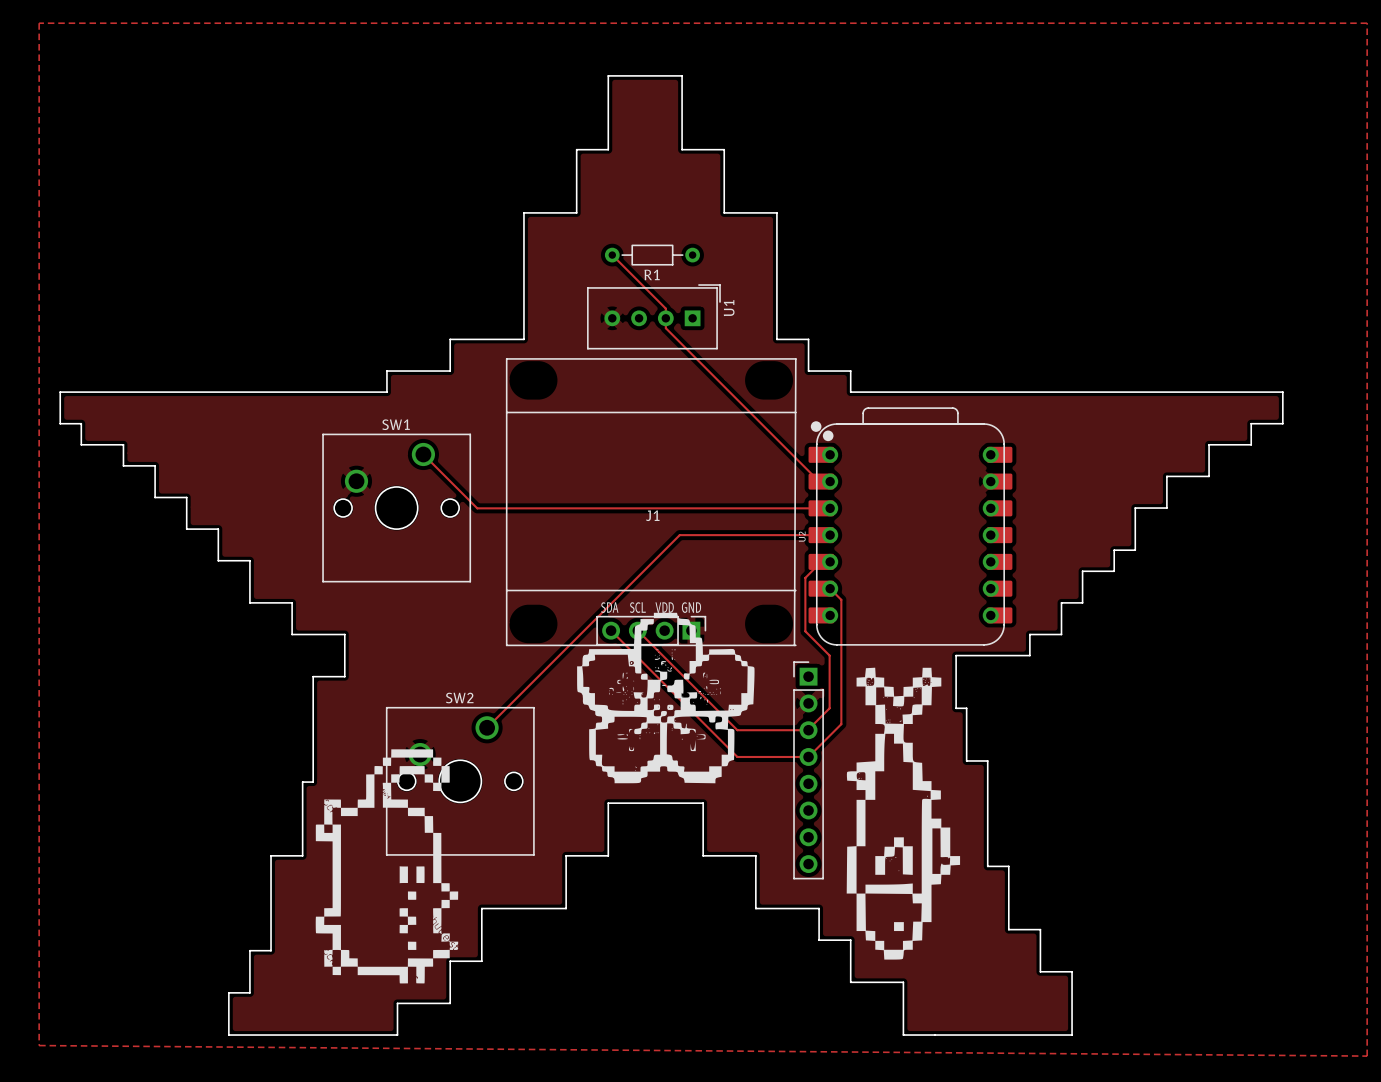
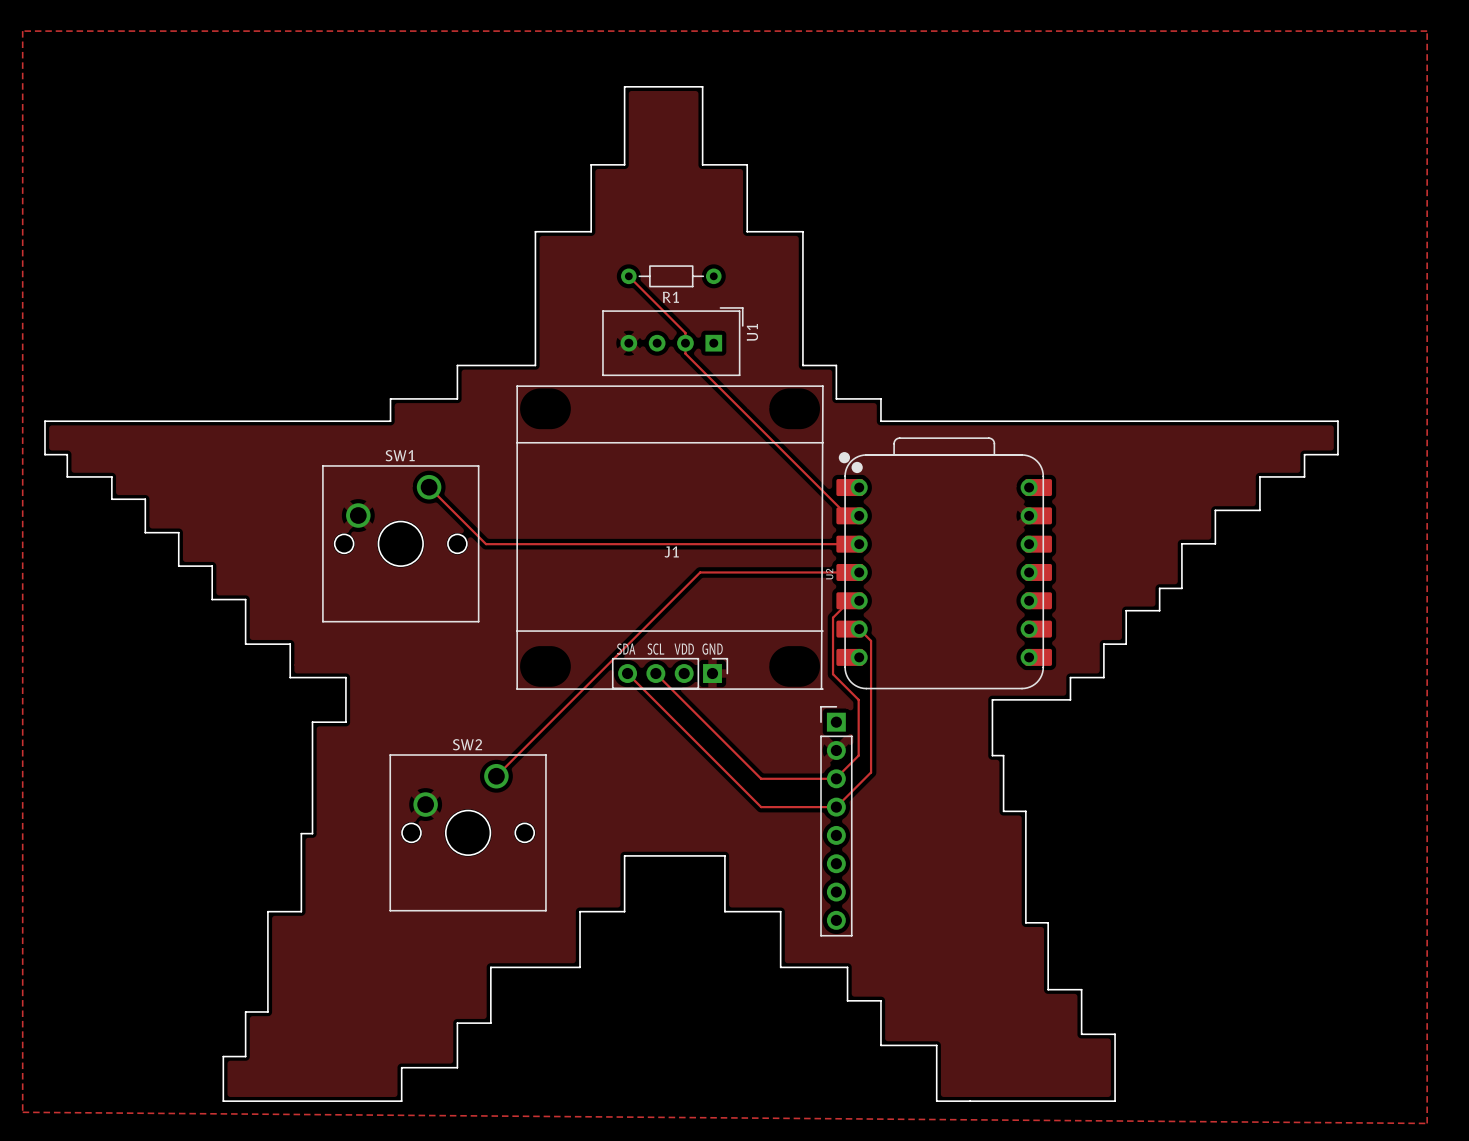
drawing: [577, 612, 755, 784] -> none
drawing: [846, 667, 961, 960] -> none
drawing: [315, 749, 459, 984] -> none

